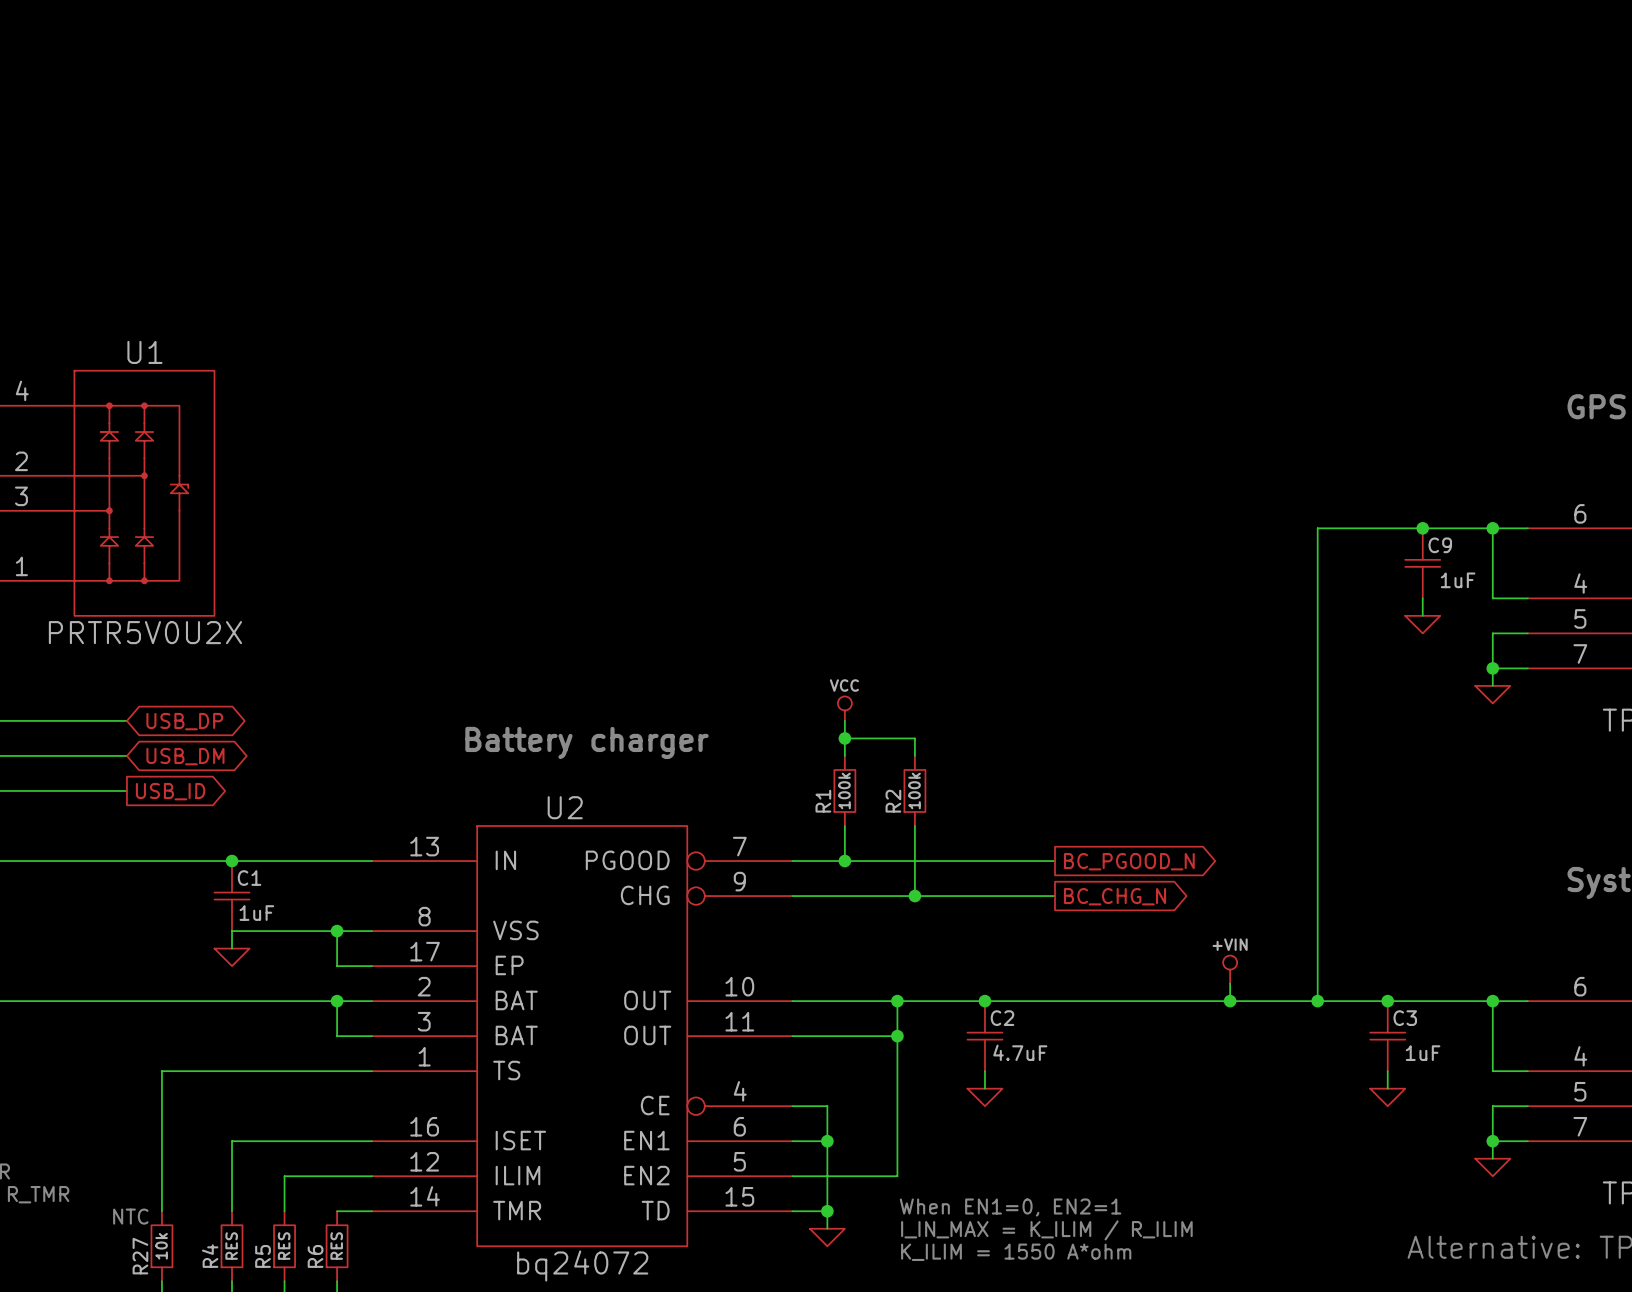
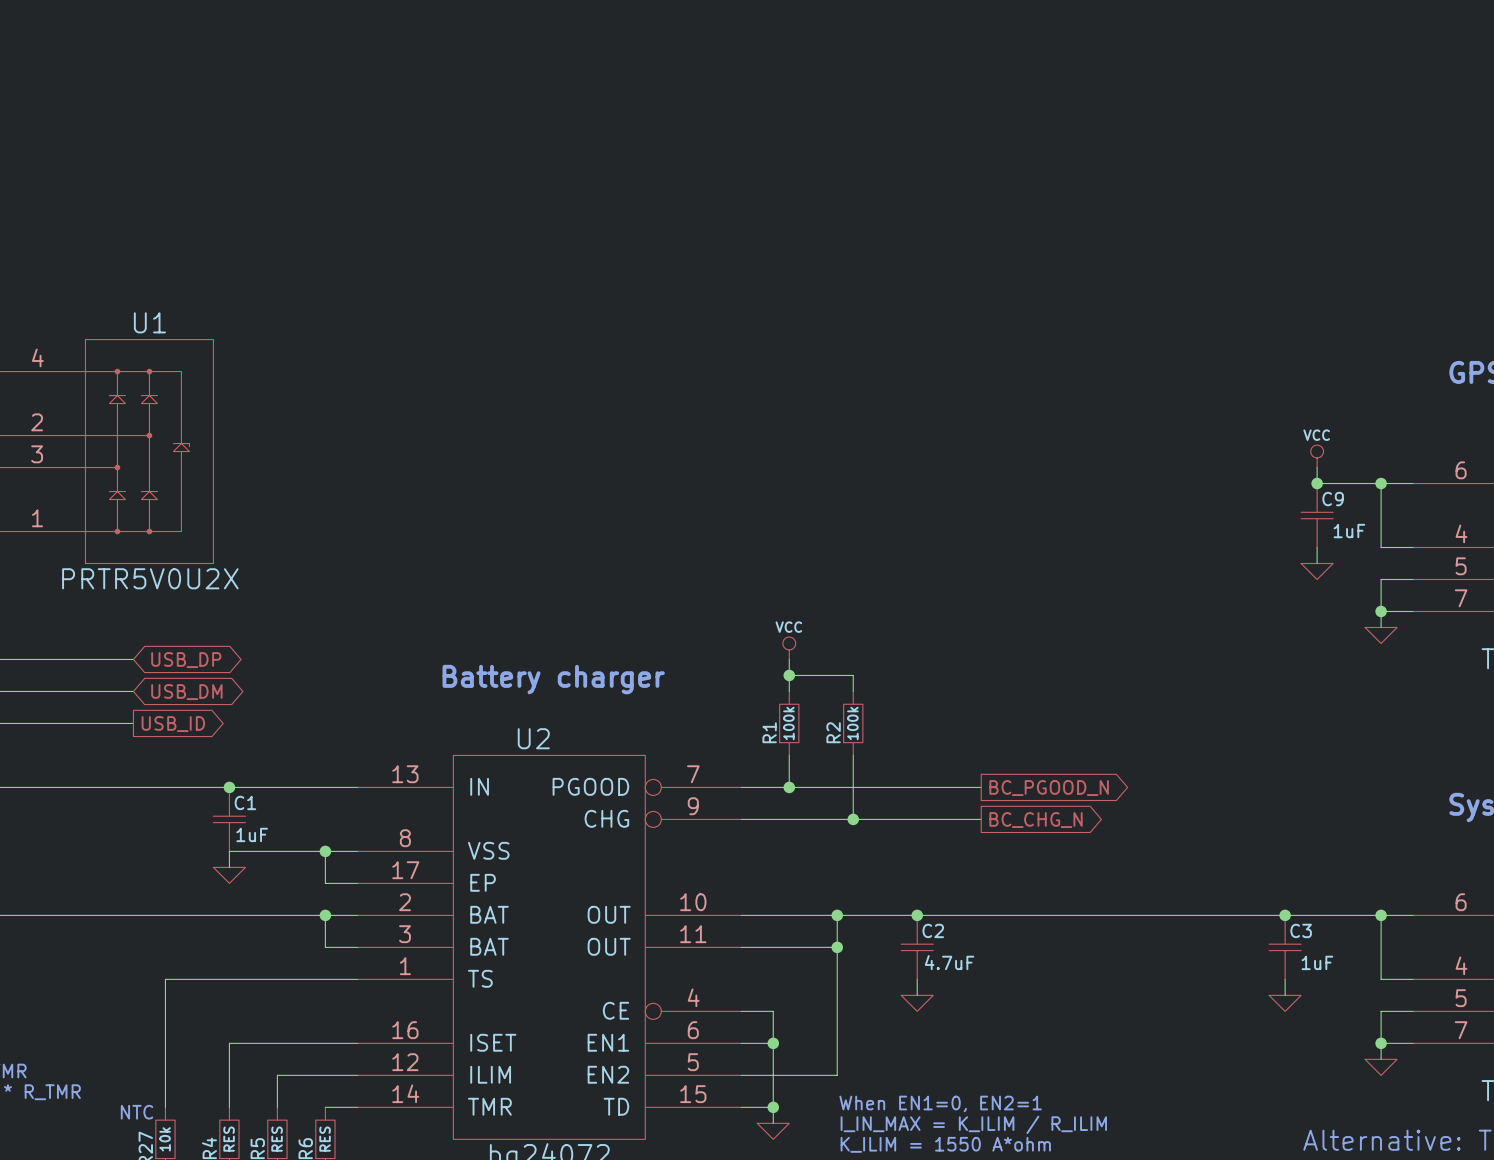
power symbol: none -> VCC (1317, 456)
wire: (1422, 528) (1317, 528) (1317, 1001) -> (1317, 483) (1317, 467)
power symbol: +VIN (1230, 969) -> none
wire: (1230, 983) (1230, 1001) -> none
junction: (1230, 1001) -> none
junction: (1317, 1001) -> none

